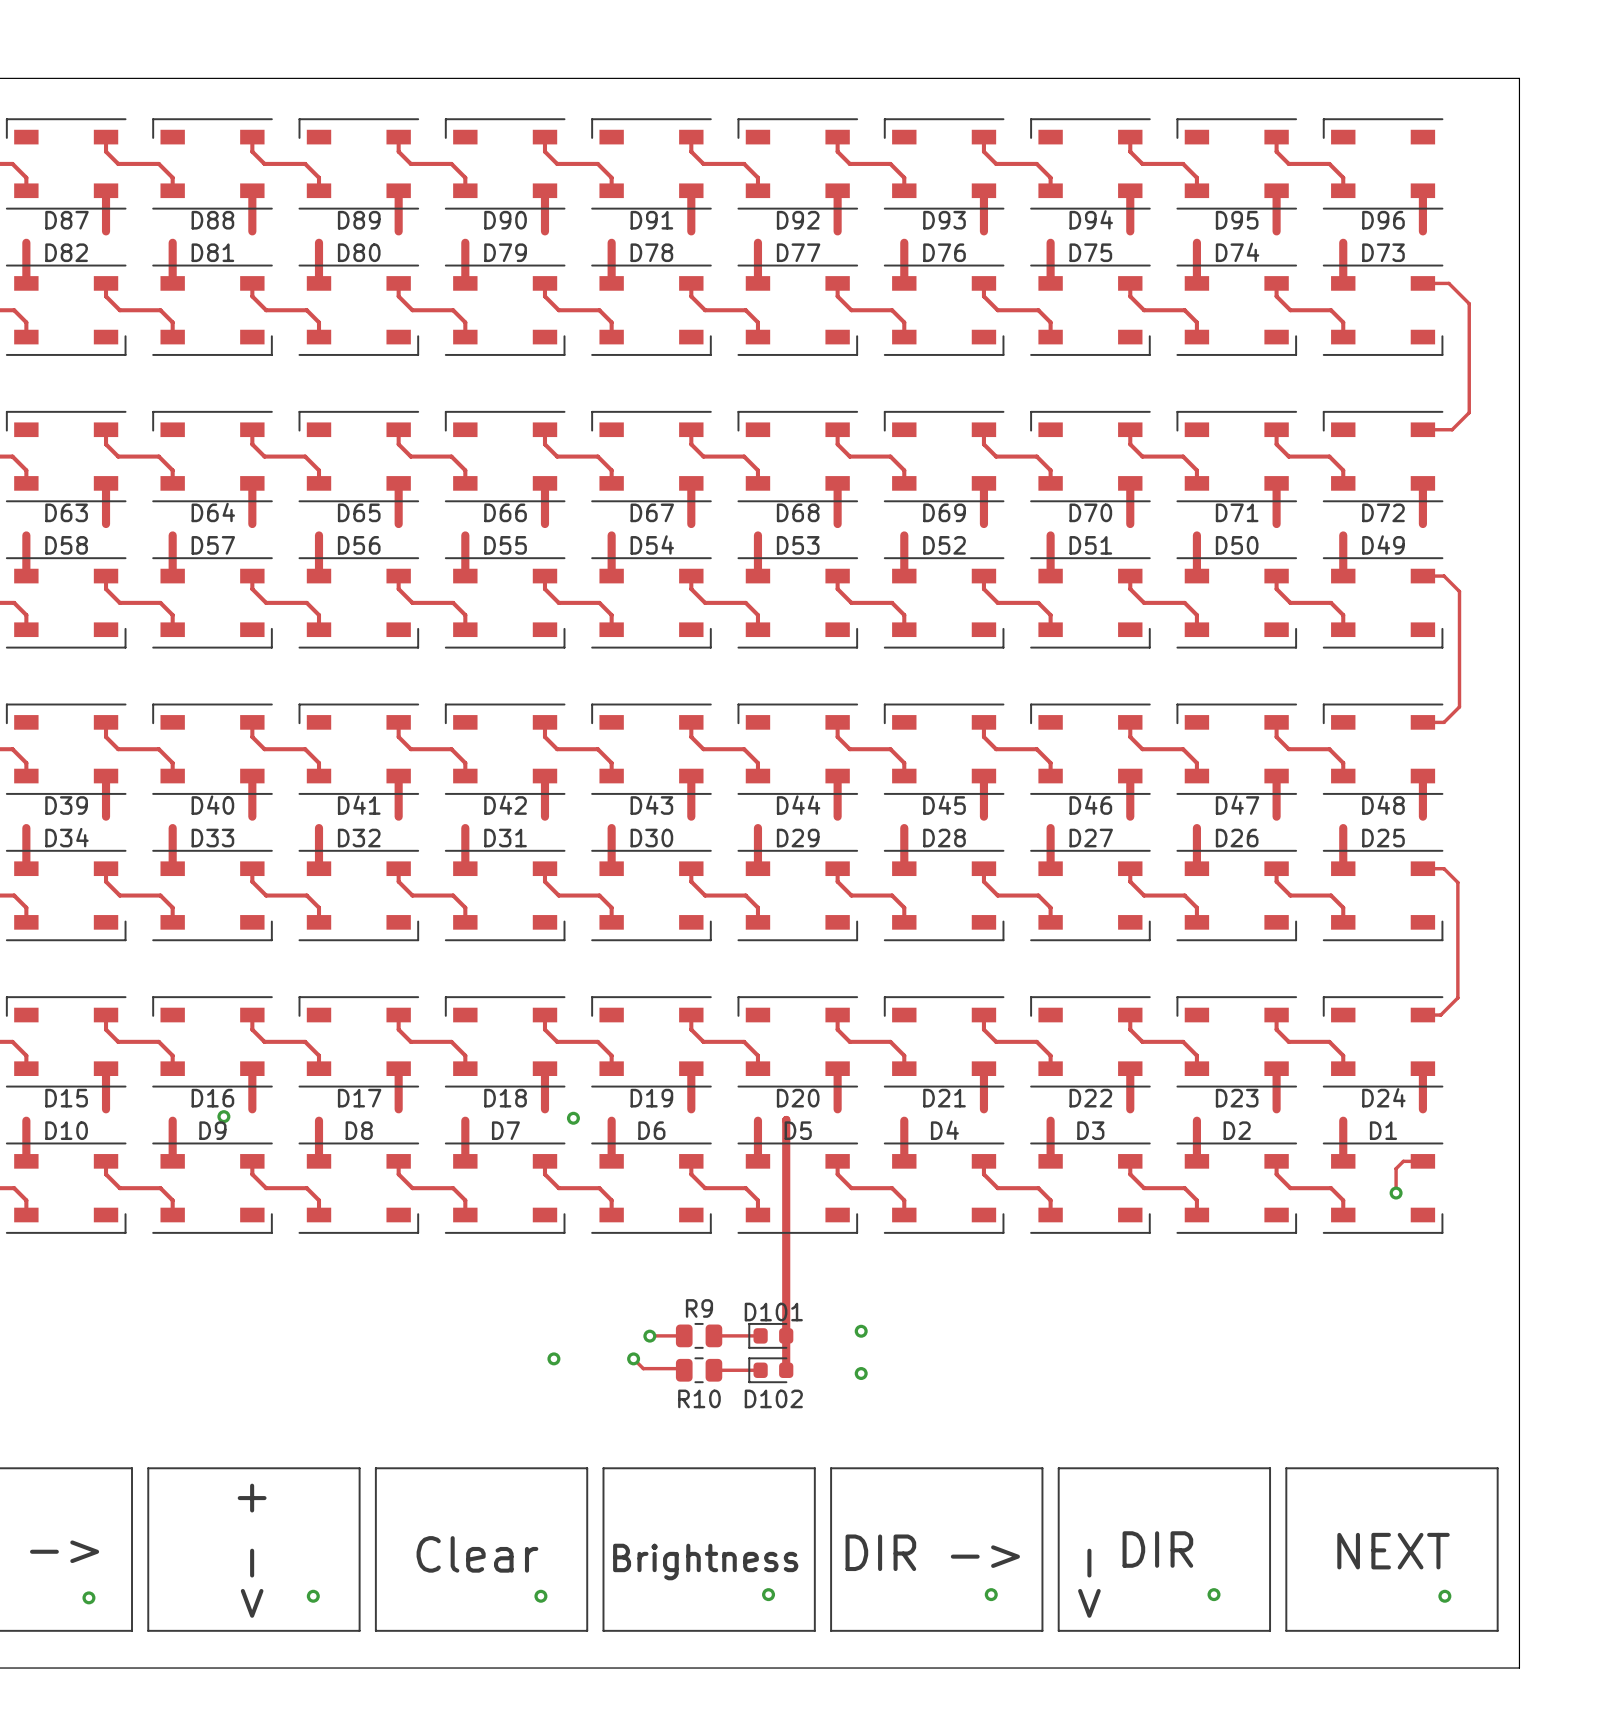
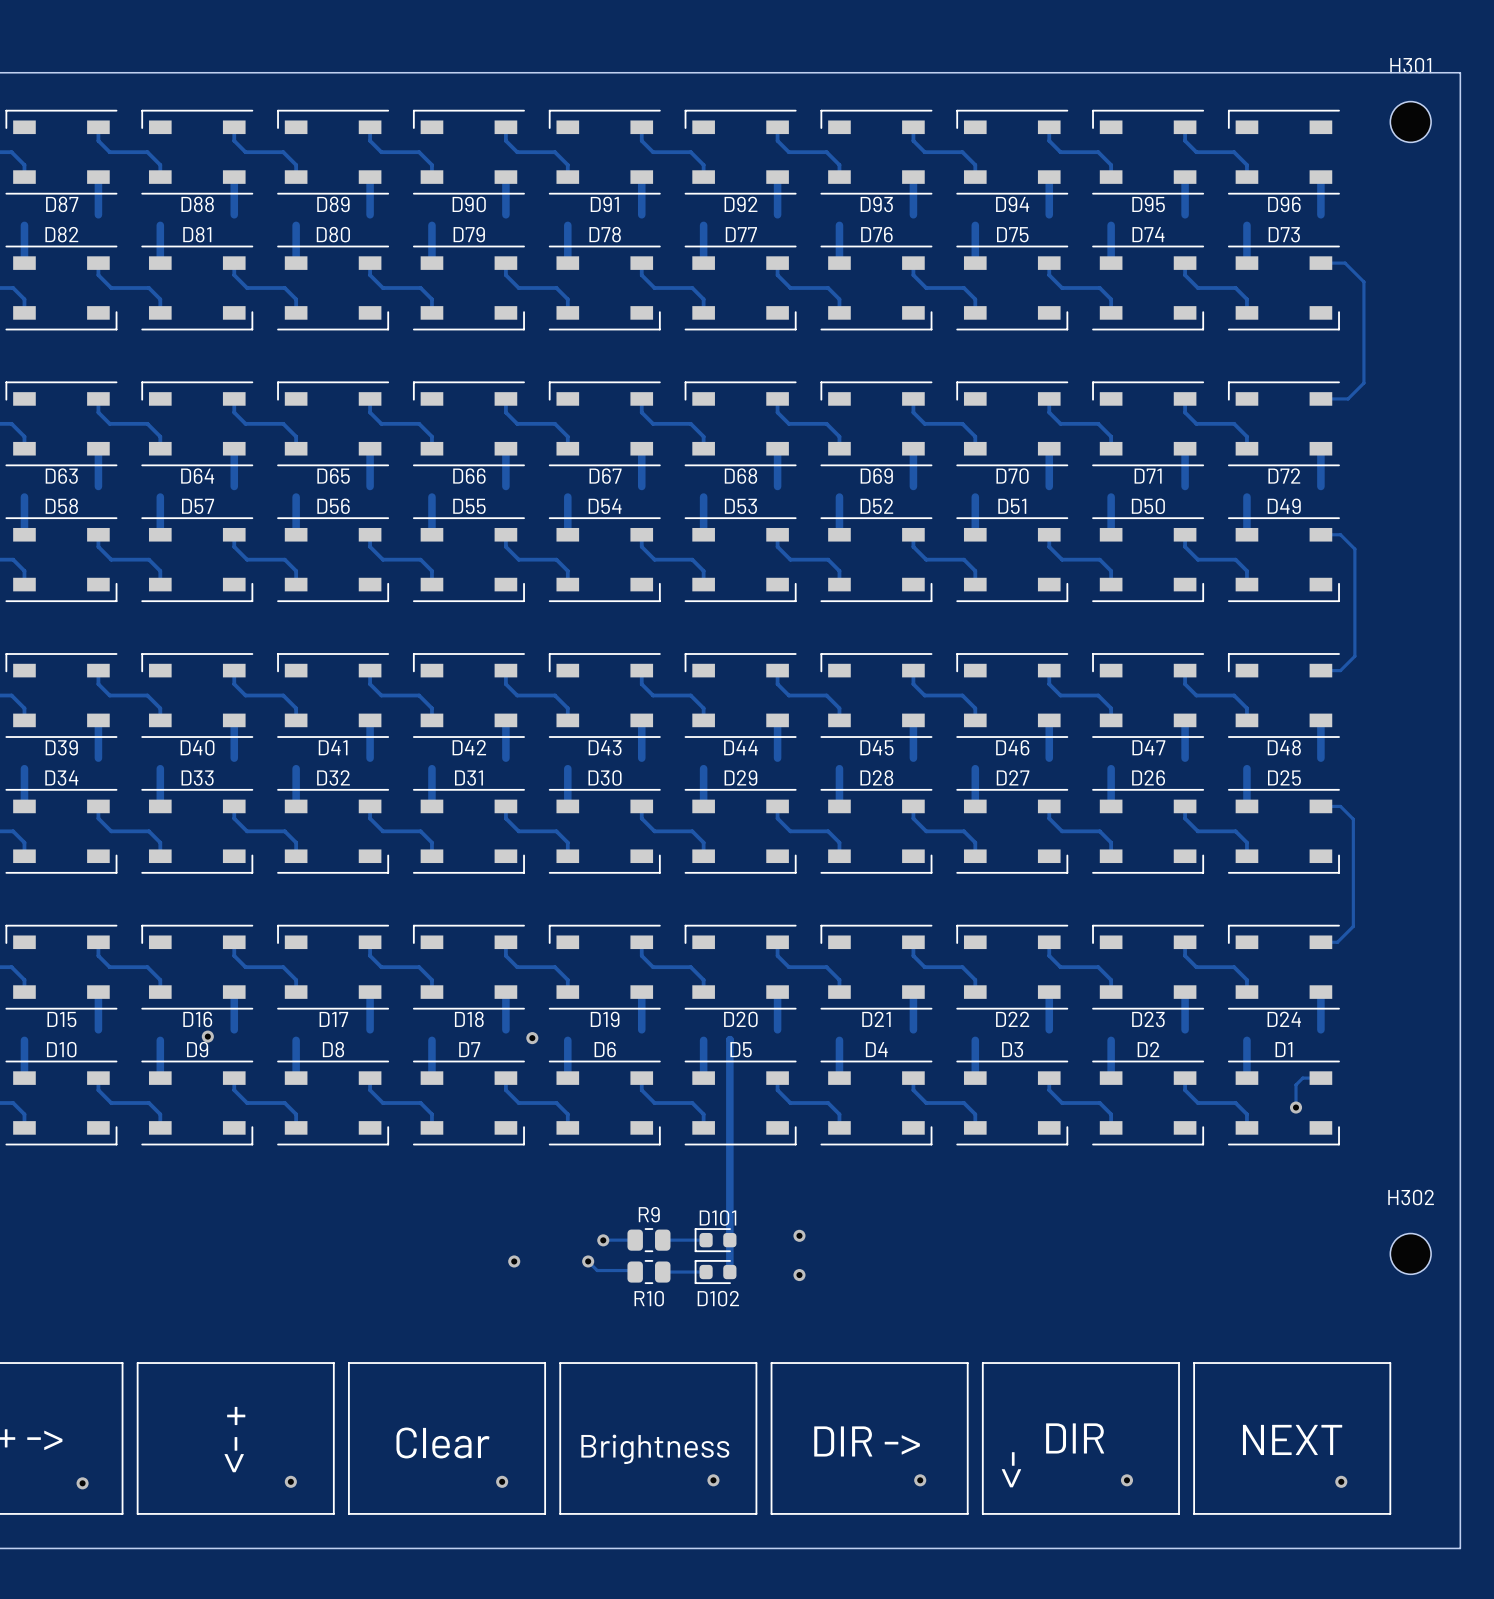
board edge: (1519, 78) (1519, 1668) -> (1410, 72) (1460, 72) (1460, 1548) (1410, 1548)
H301: none -> (1410, 121)
H302: none -> (1410, 1253)

